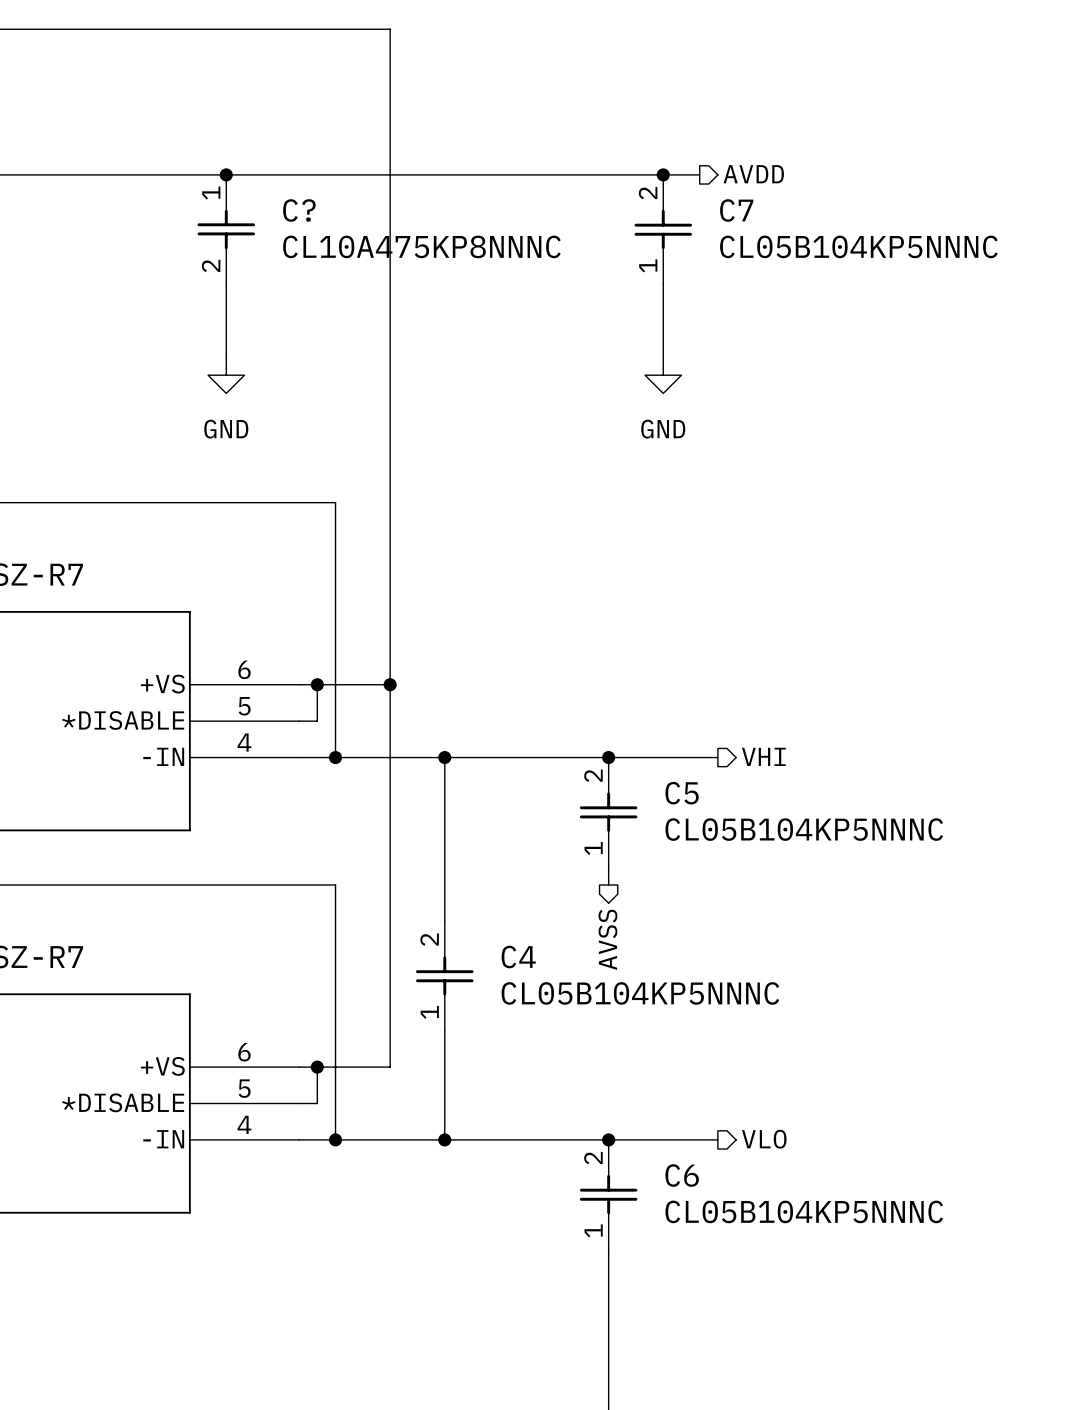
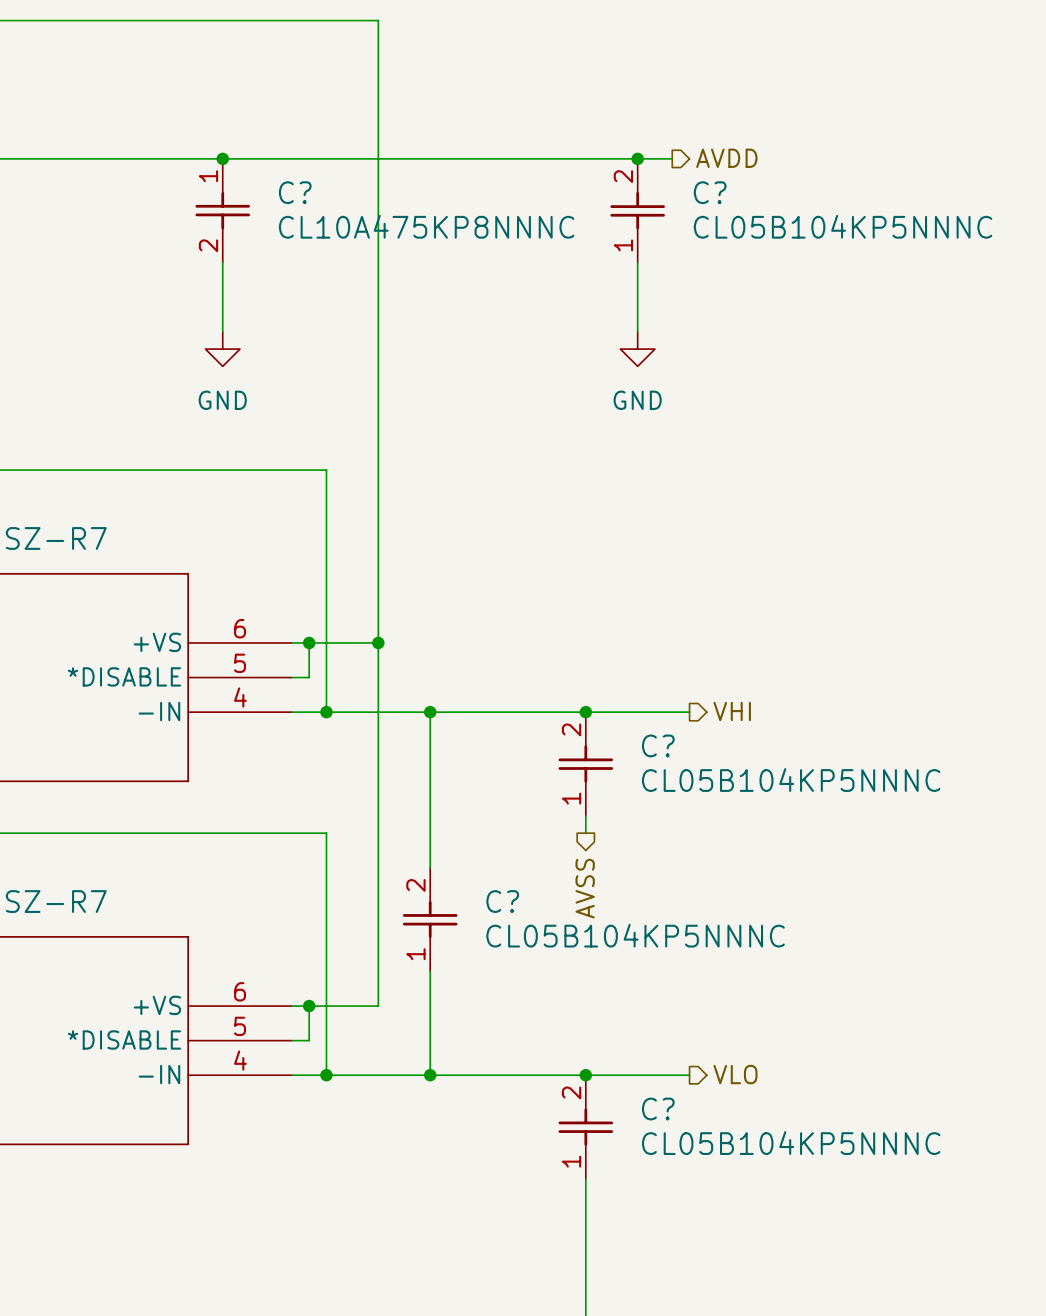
C7 name: C7 (736, 210) -> C? (710, 192)
C5 name: C5 (682, 793) -> C? (658, 745)
C4 name: C4 (518, 957) -> C? (502, 901)
C6 name: C6 (682, 1175) -> C? (658, 1109)

